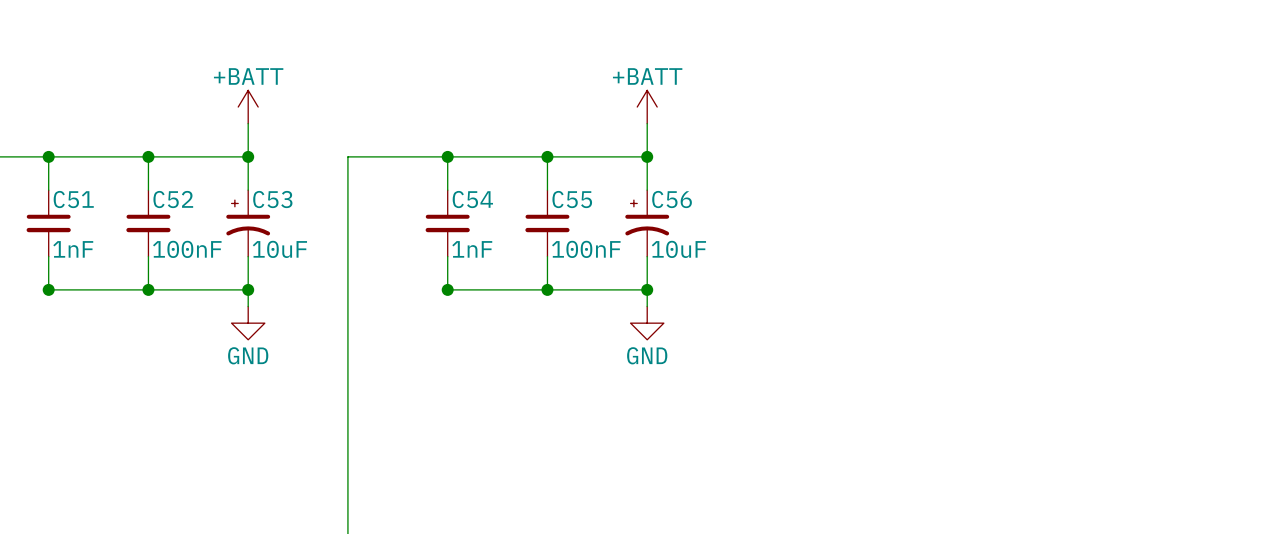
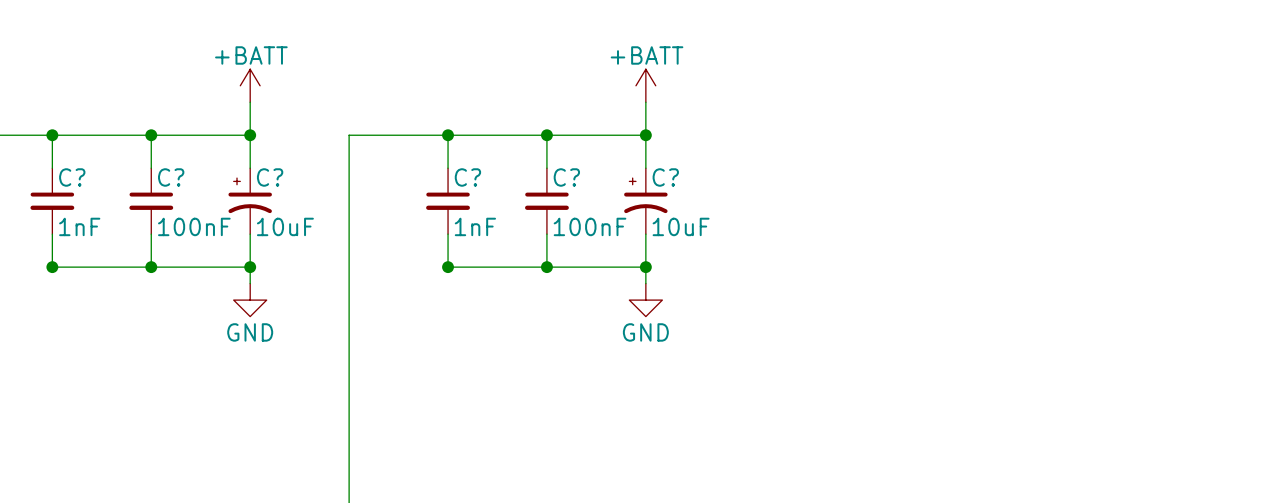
C51 name: C51 (73, 199) -> C? (72, 177)
C52 name: C52 (173, 199) -> C? (171, 177)
C53 name: C53 (272, 199) -> C? (270, 177)
C54 name: C54 (472, 199) -> C? (467, 177)
C55 name: C55 (572, 199) -> C? (566, 177)
C56 name: C56 (672, 199) -> C? (665, 177)

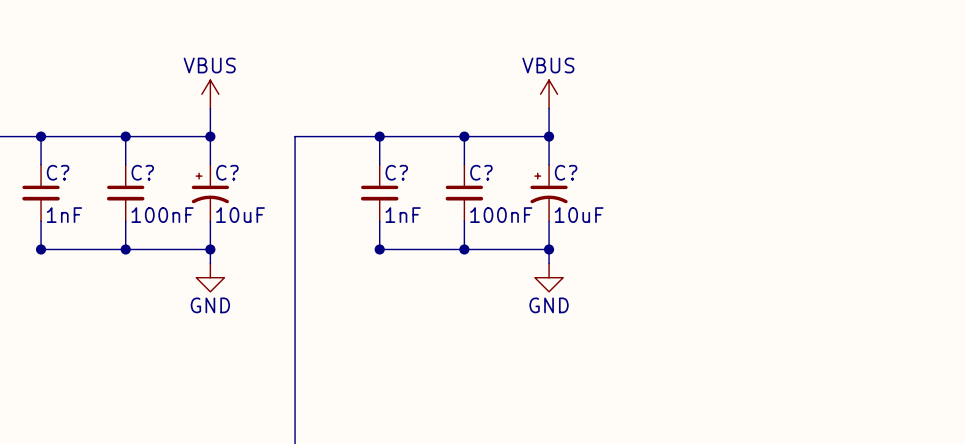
power symbol: +BATT (250, 85) -> VBUS (210, 94)
power symbol: +BATT (645, 85) -> VBUS (549, 94)

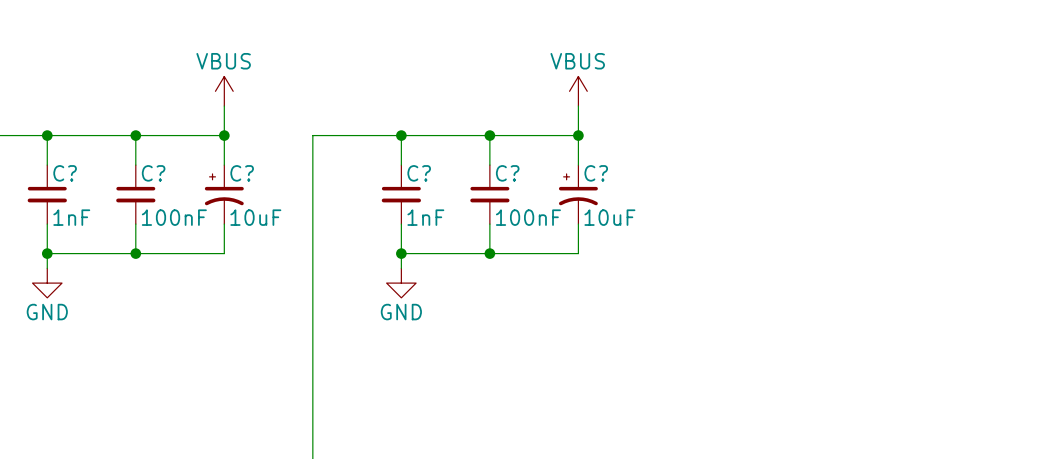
wire: none -> (47, 253) (47, 268)
wire: (210, 249) (210, 263) -> (401, 253) (401, 268)
junction: (210, 249) -> none
wire: (549, 249) (549, 263) -> none
junction: (549, 249) -> none
power symbol: none -> GND (47, 283)
power symbol: GND (210, 277) -> none
power symbol: none -> GND (401, 283)
power symbol: GND (549, 277) -> none

